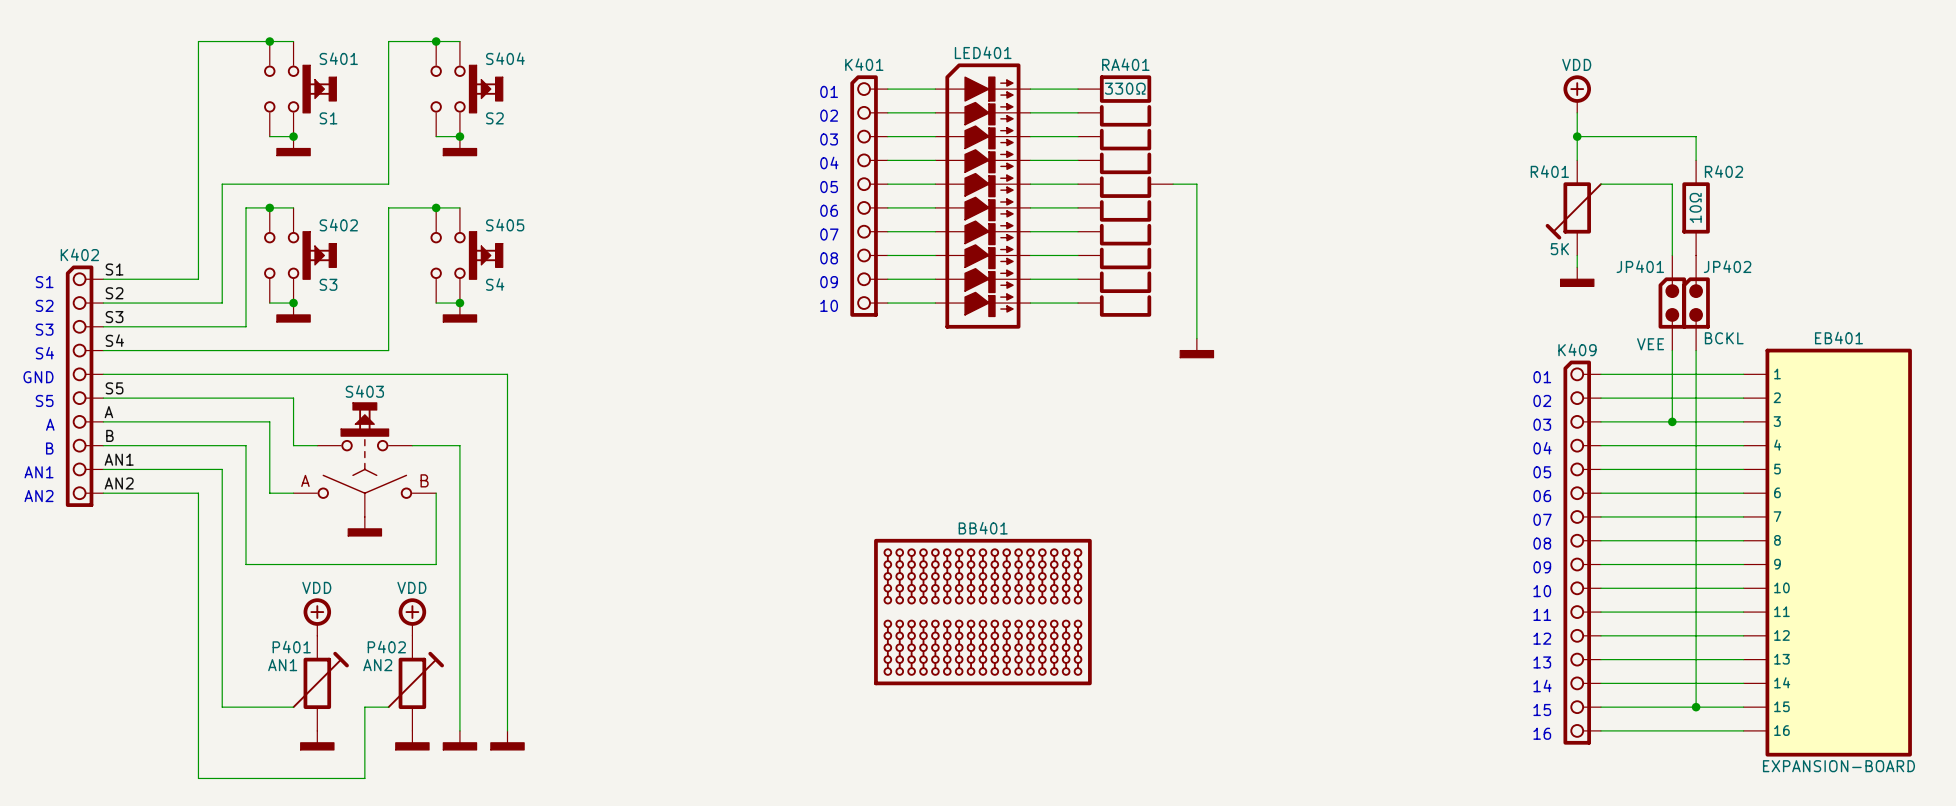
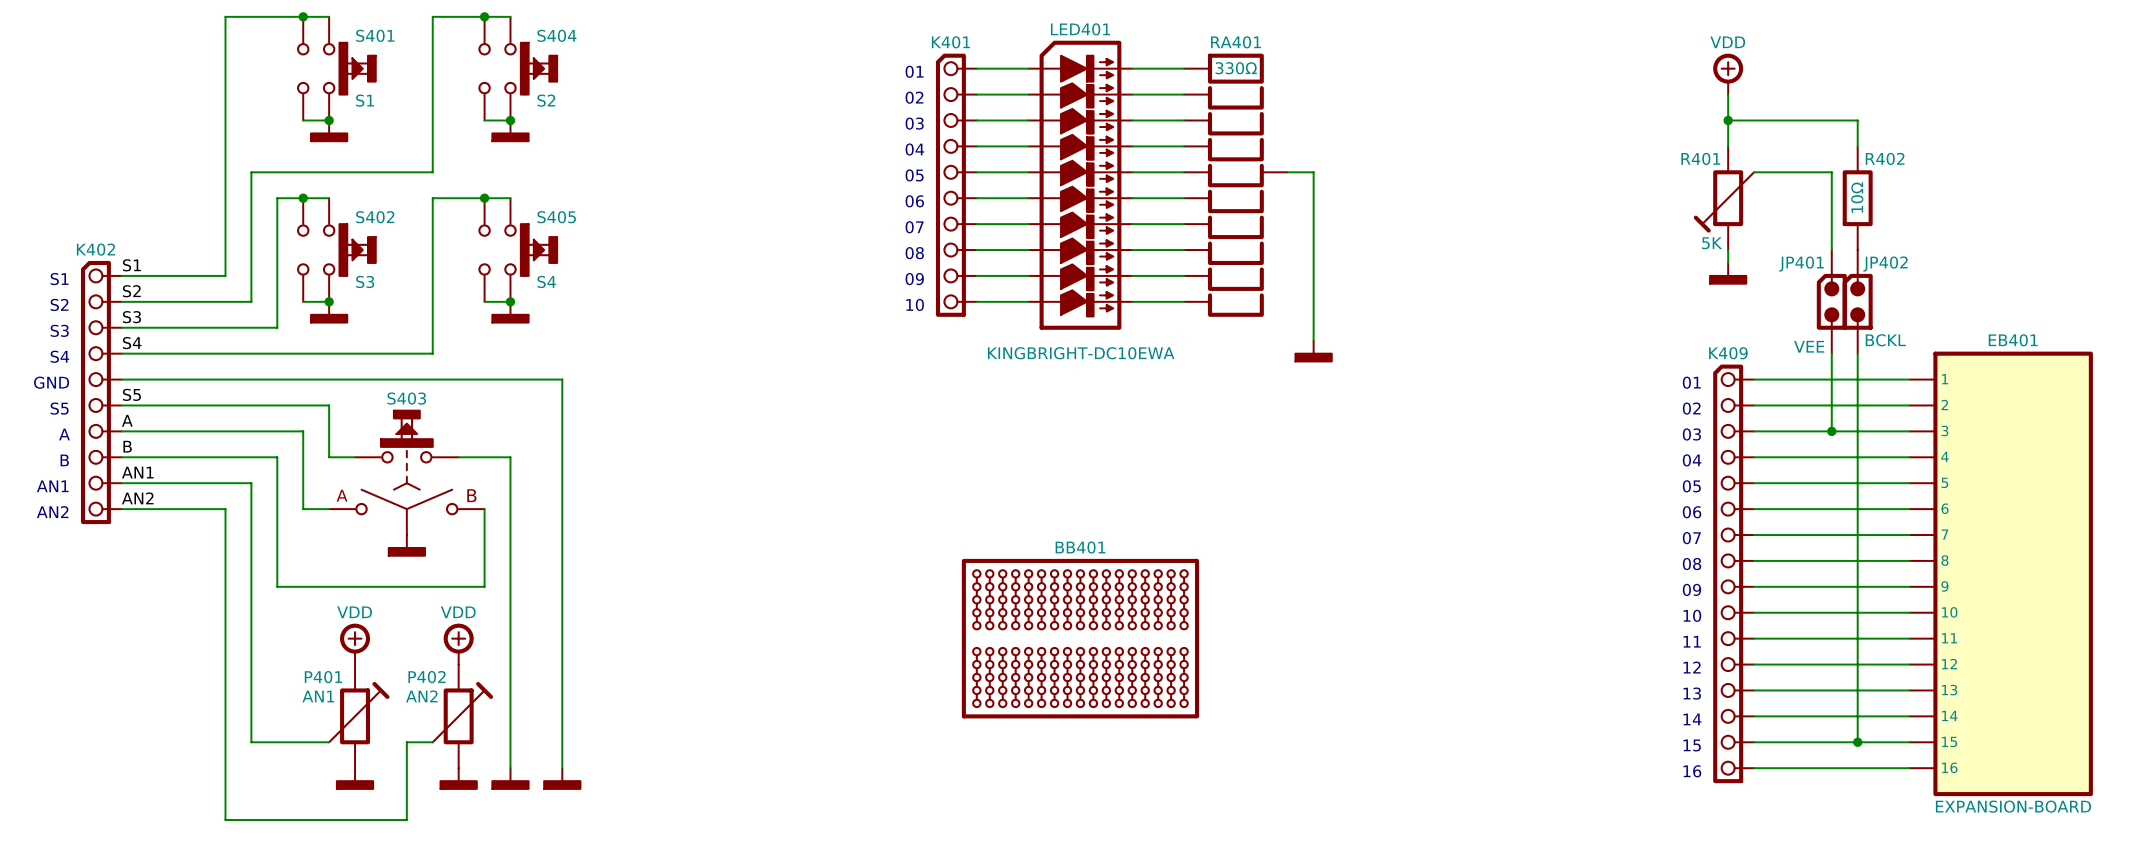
LED401 value: none -> KINGBRIGHT-DC10EWA (1081, 353)

